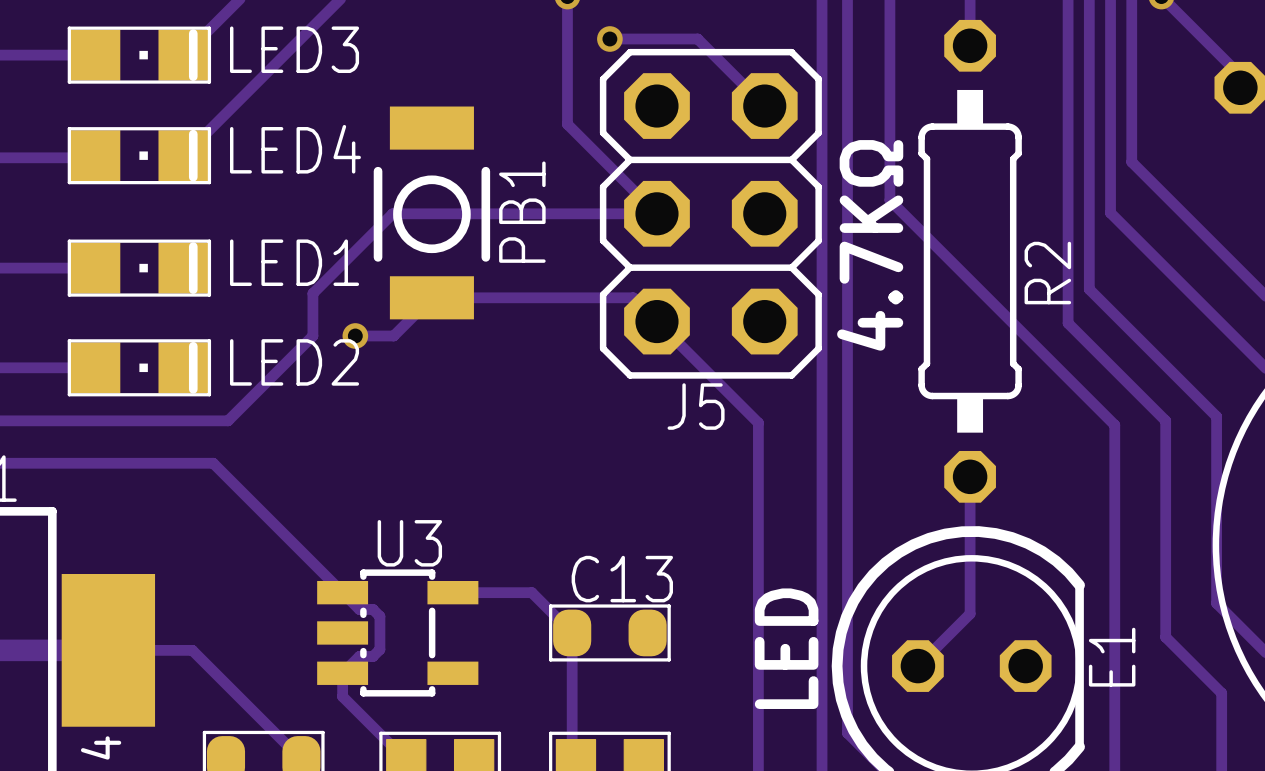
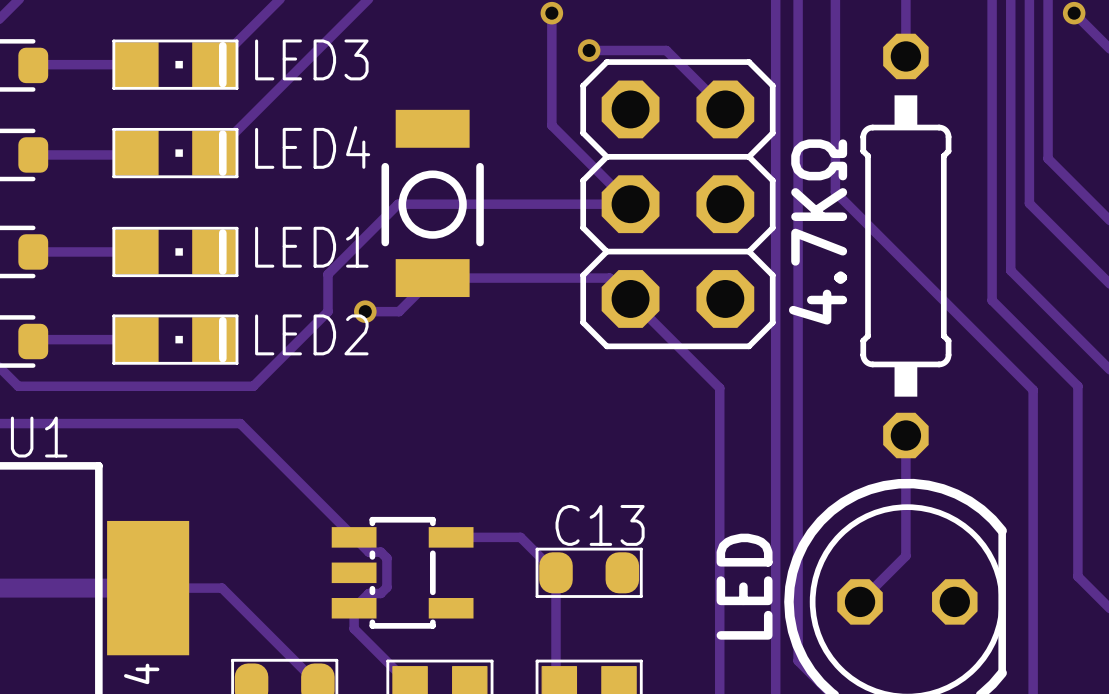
PB1 name: PB1 (522, 212) -> none
R2 name: R2 (1047, 273) -> none
J5 name: J5 (696, 406) -> none
U3 name: U3 (409, 543) -> none
E1 name: E1 (1112, 657) -> none

